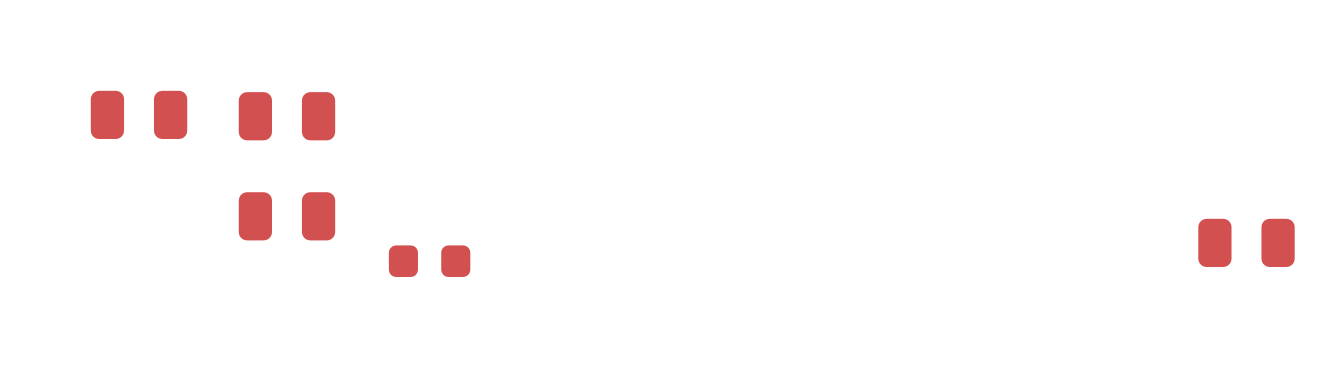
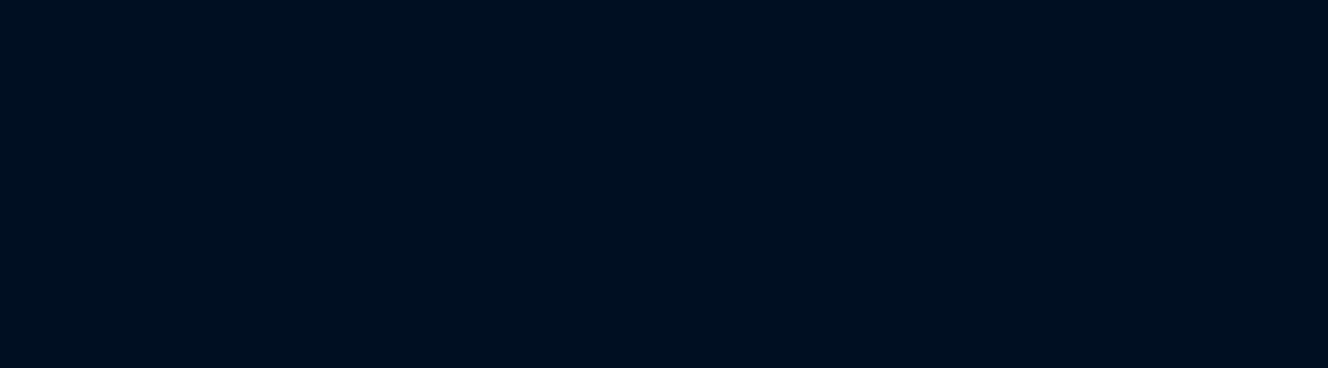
part: (139, 114) -> none
part: (286, 116) -> none
part: (286, 216) -> none
part: (1246, 242) -> none
part: (429, 261) -> none

